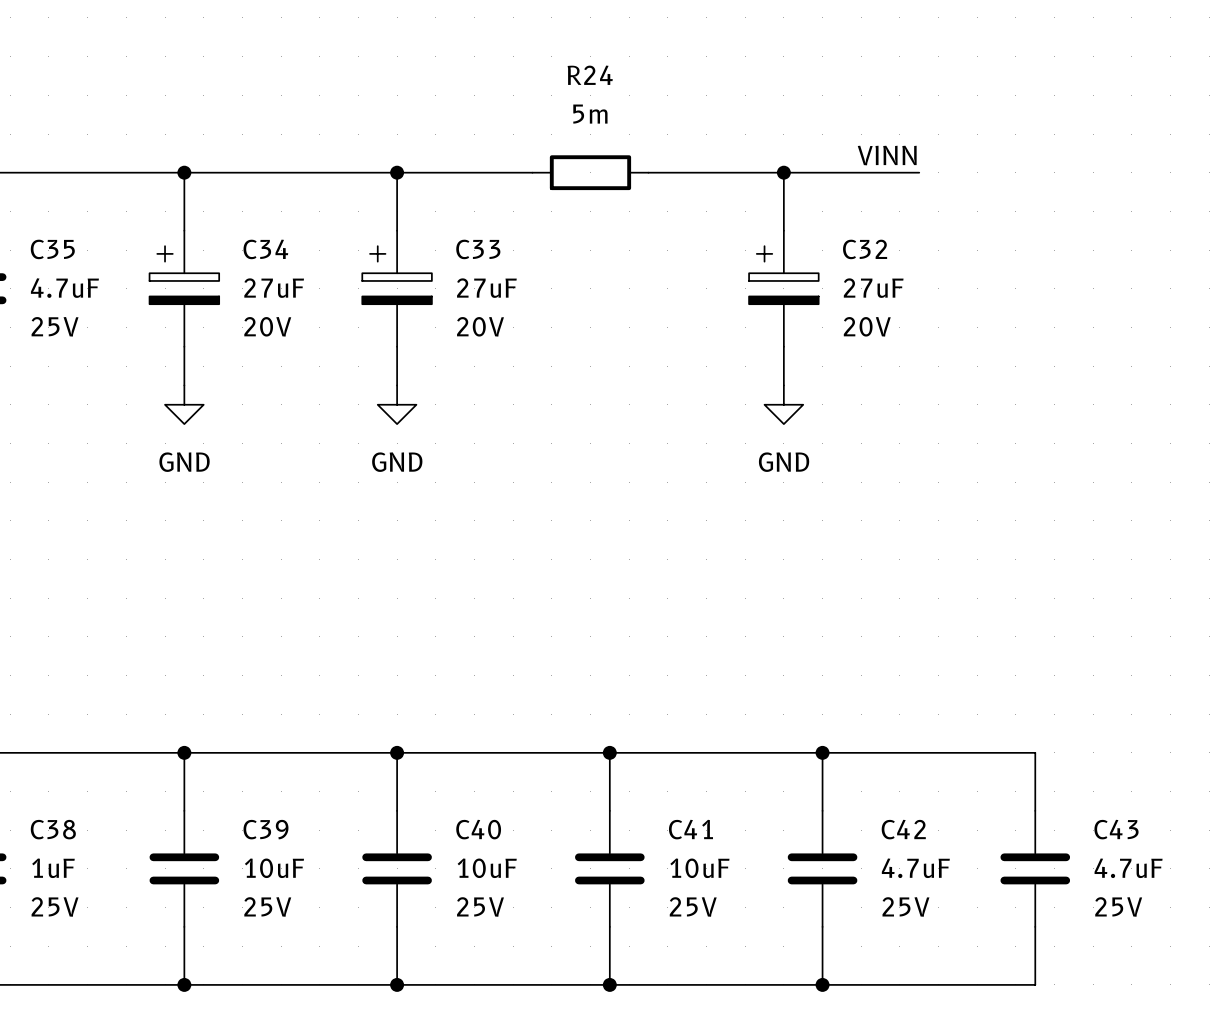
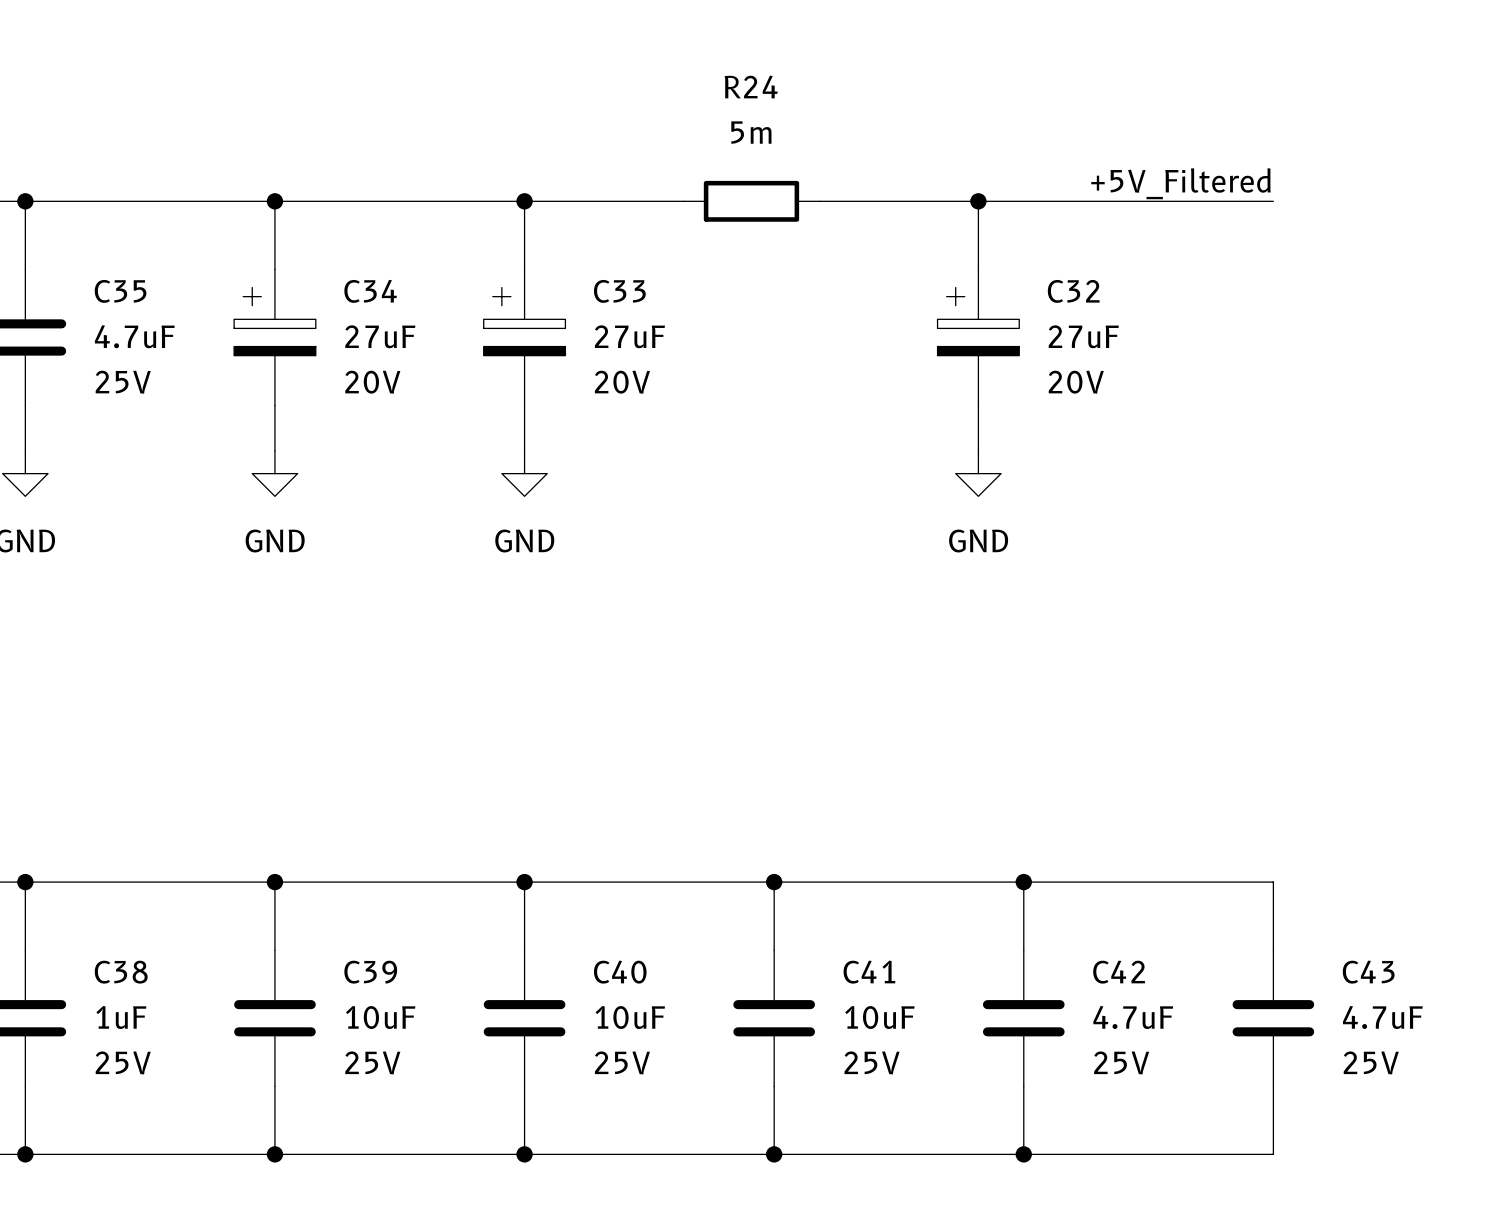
label: VINN (887, 155) -> none
label: none -> +5V_Filtered (1180, 183)
wire: none -> (1137, 201) (1273, 201)

